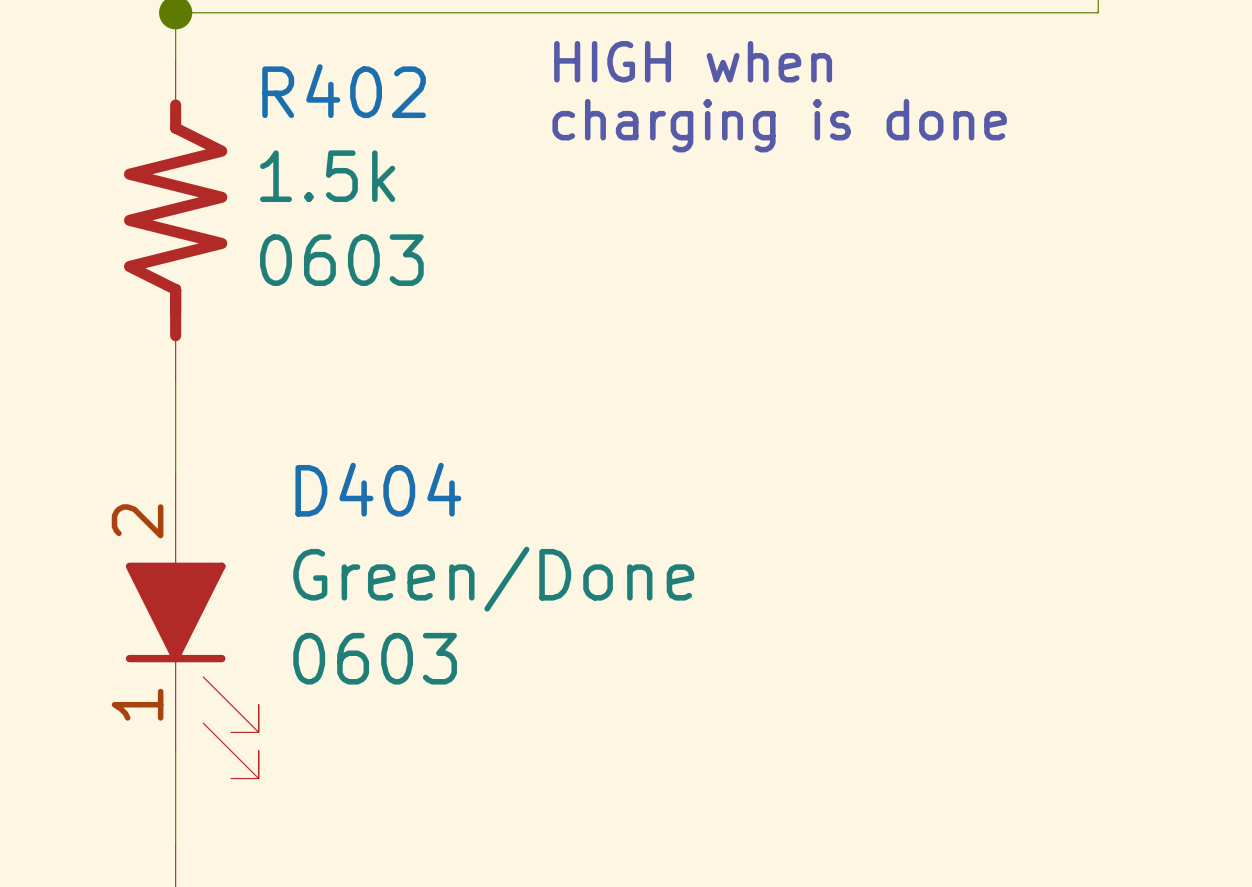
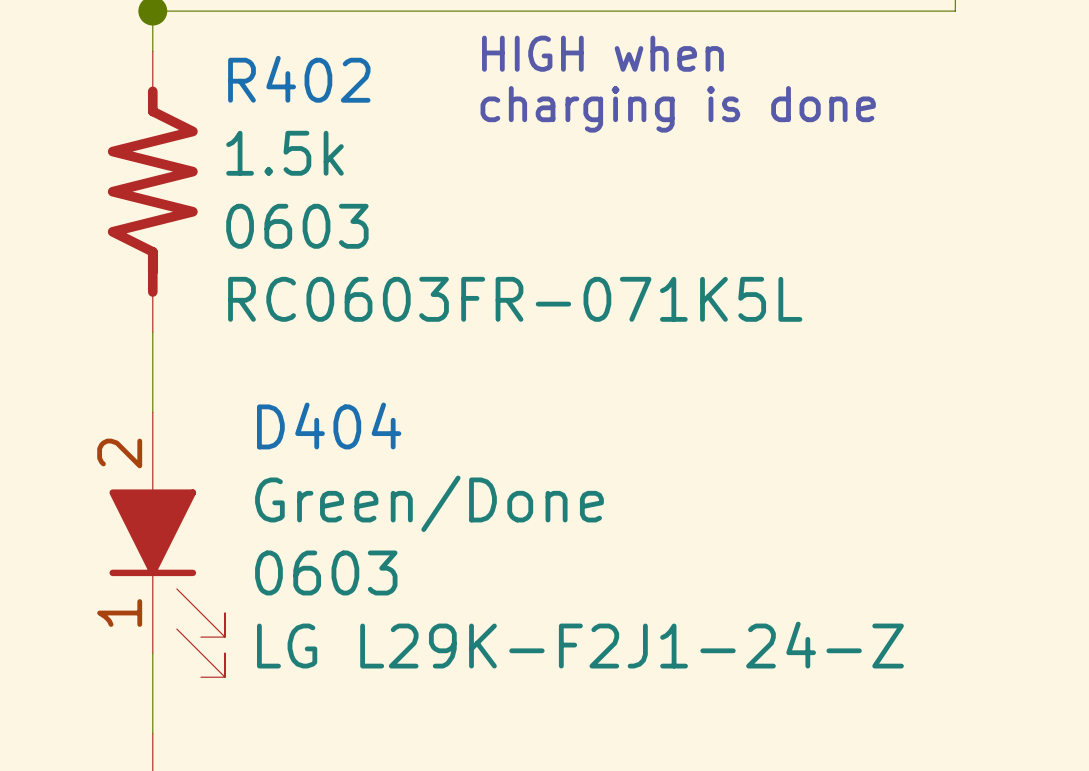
R402 text: none -> RC0603FR-071K5L (515, 299)
D404 text: none -> LG L29K-F2J1-24-Z (580, 645)

